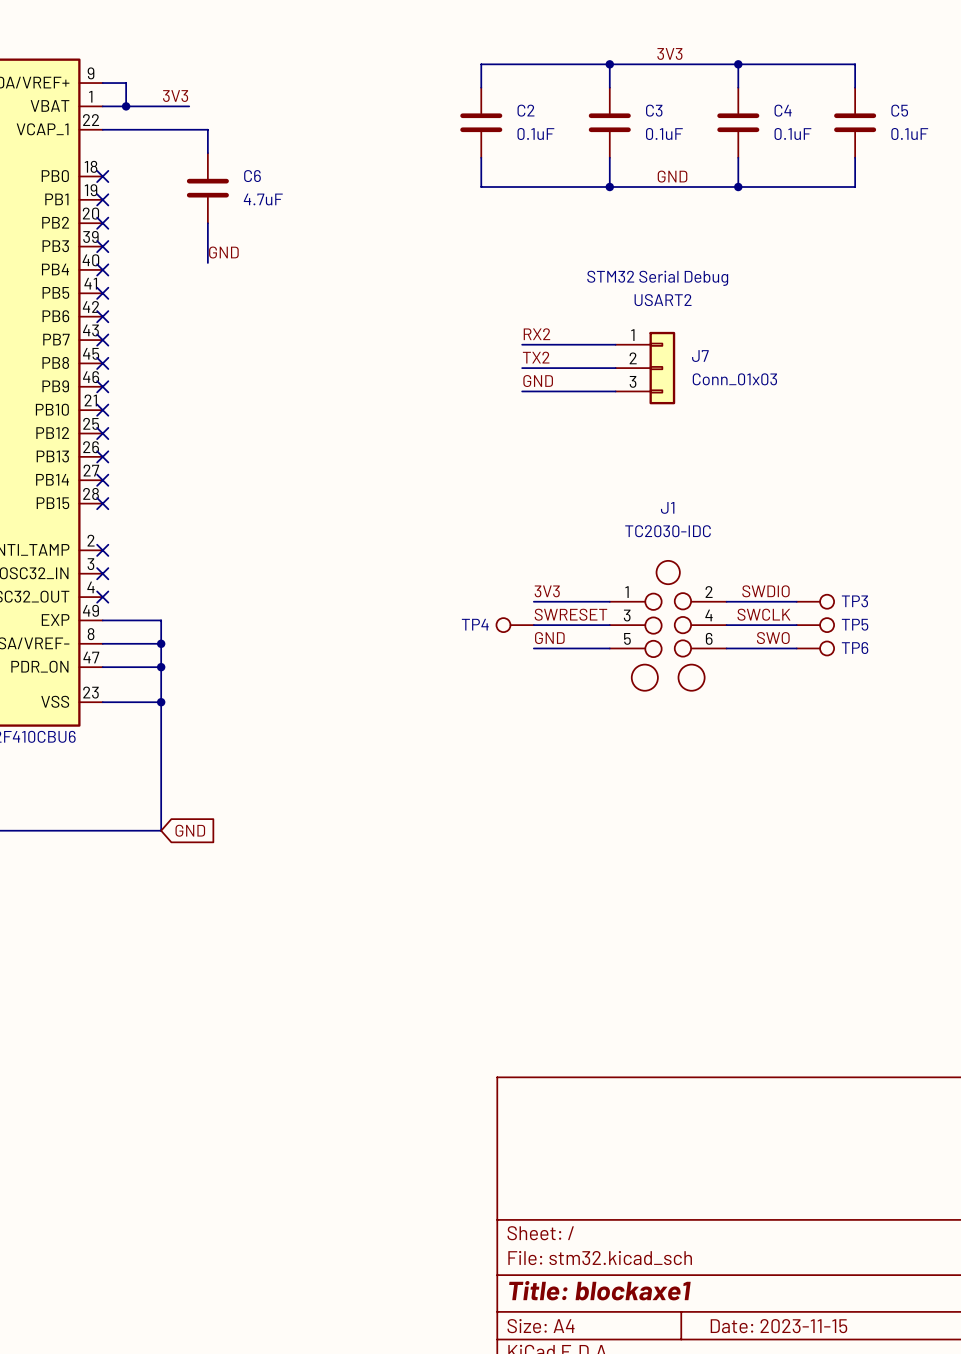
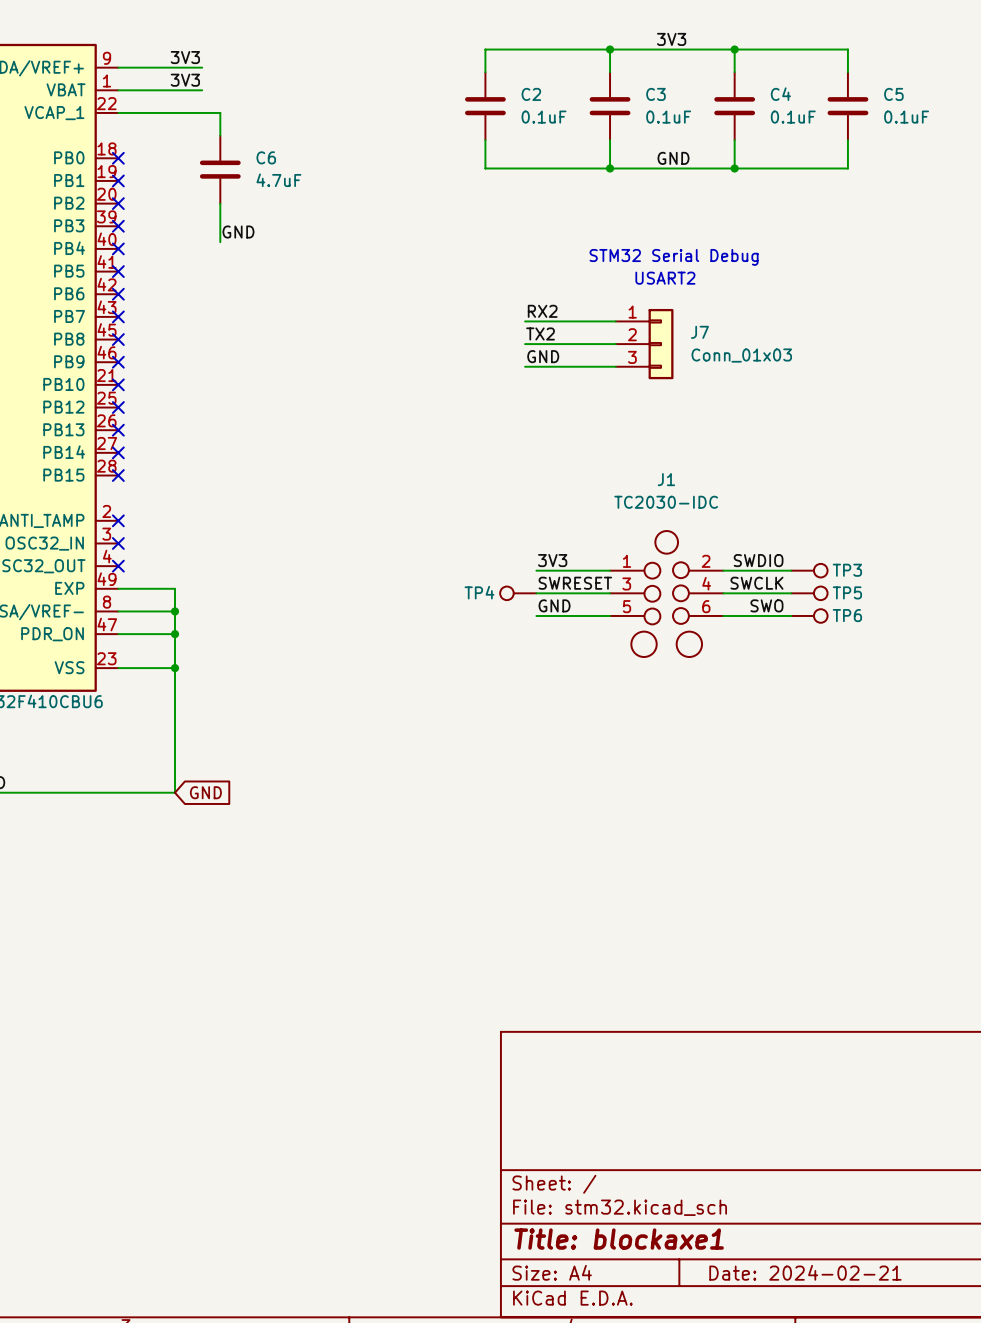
label: none -> 3V3 (185, 57)
wire: (126, 83) (126, 106) -> (141, 67) (202, 67)
junction: (126, 106) -> none
title block: Date: 2023-11-15 (778, 1326) -> Date: 2024-02-21 (805, 1272)

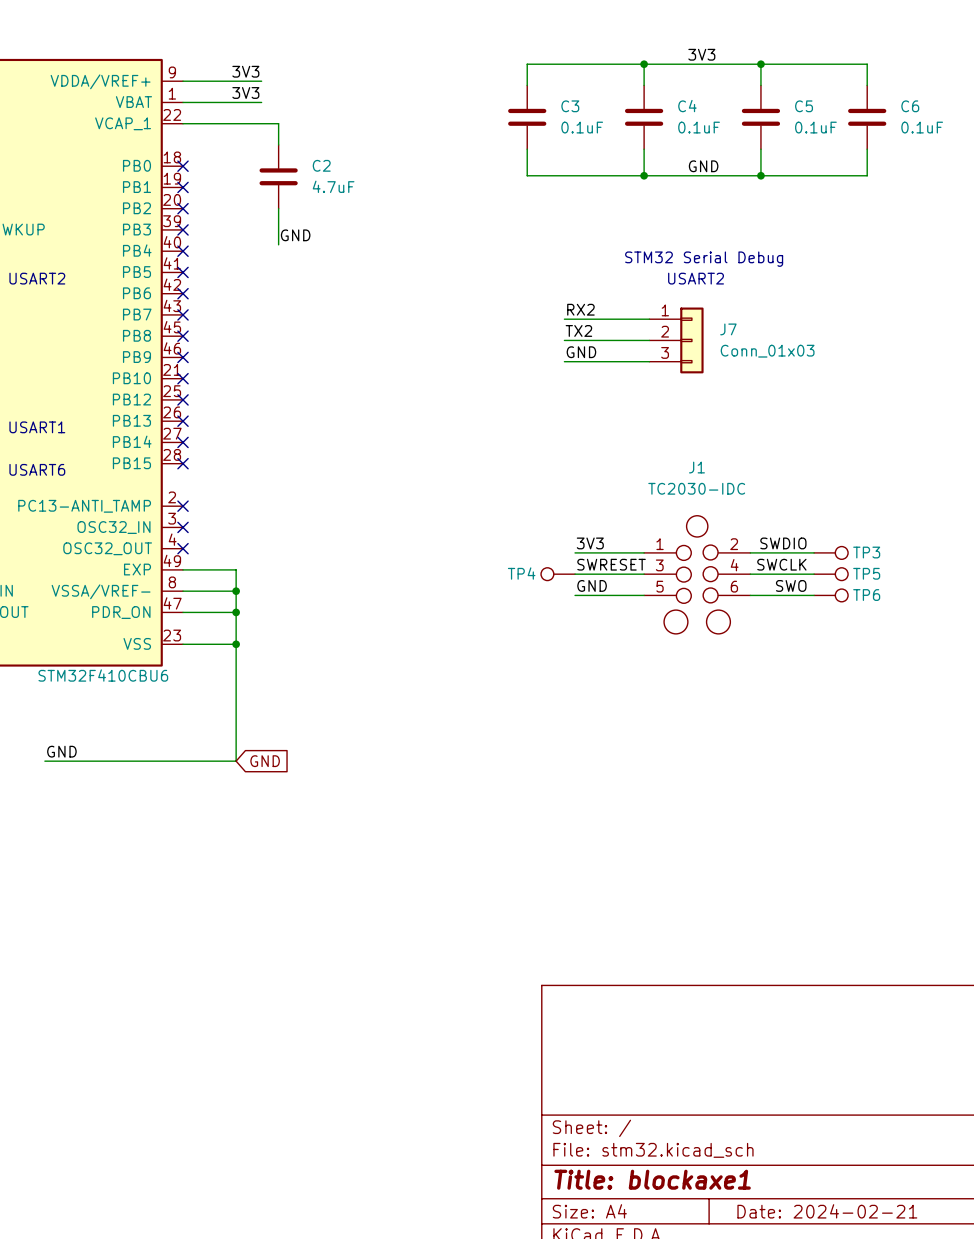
C2 name: C2 (531, 94) -> C3 (570, 106)
C3 name: C3 (655, 94) -> C4 (687, 106)
C4 name: C4 (780, 94) -> C5 (804, 106)
C5 name: C5 (893, 94) -> C6 (910, 106)
C6 name: C6 (266, 157) -> C2 (321, 165)

